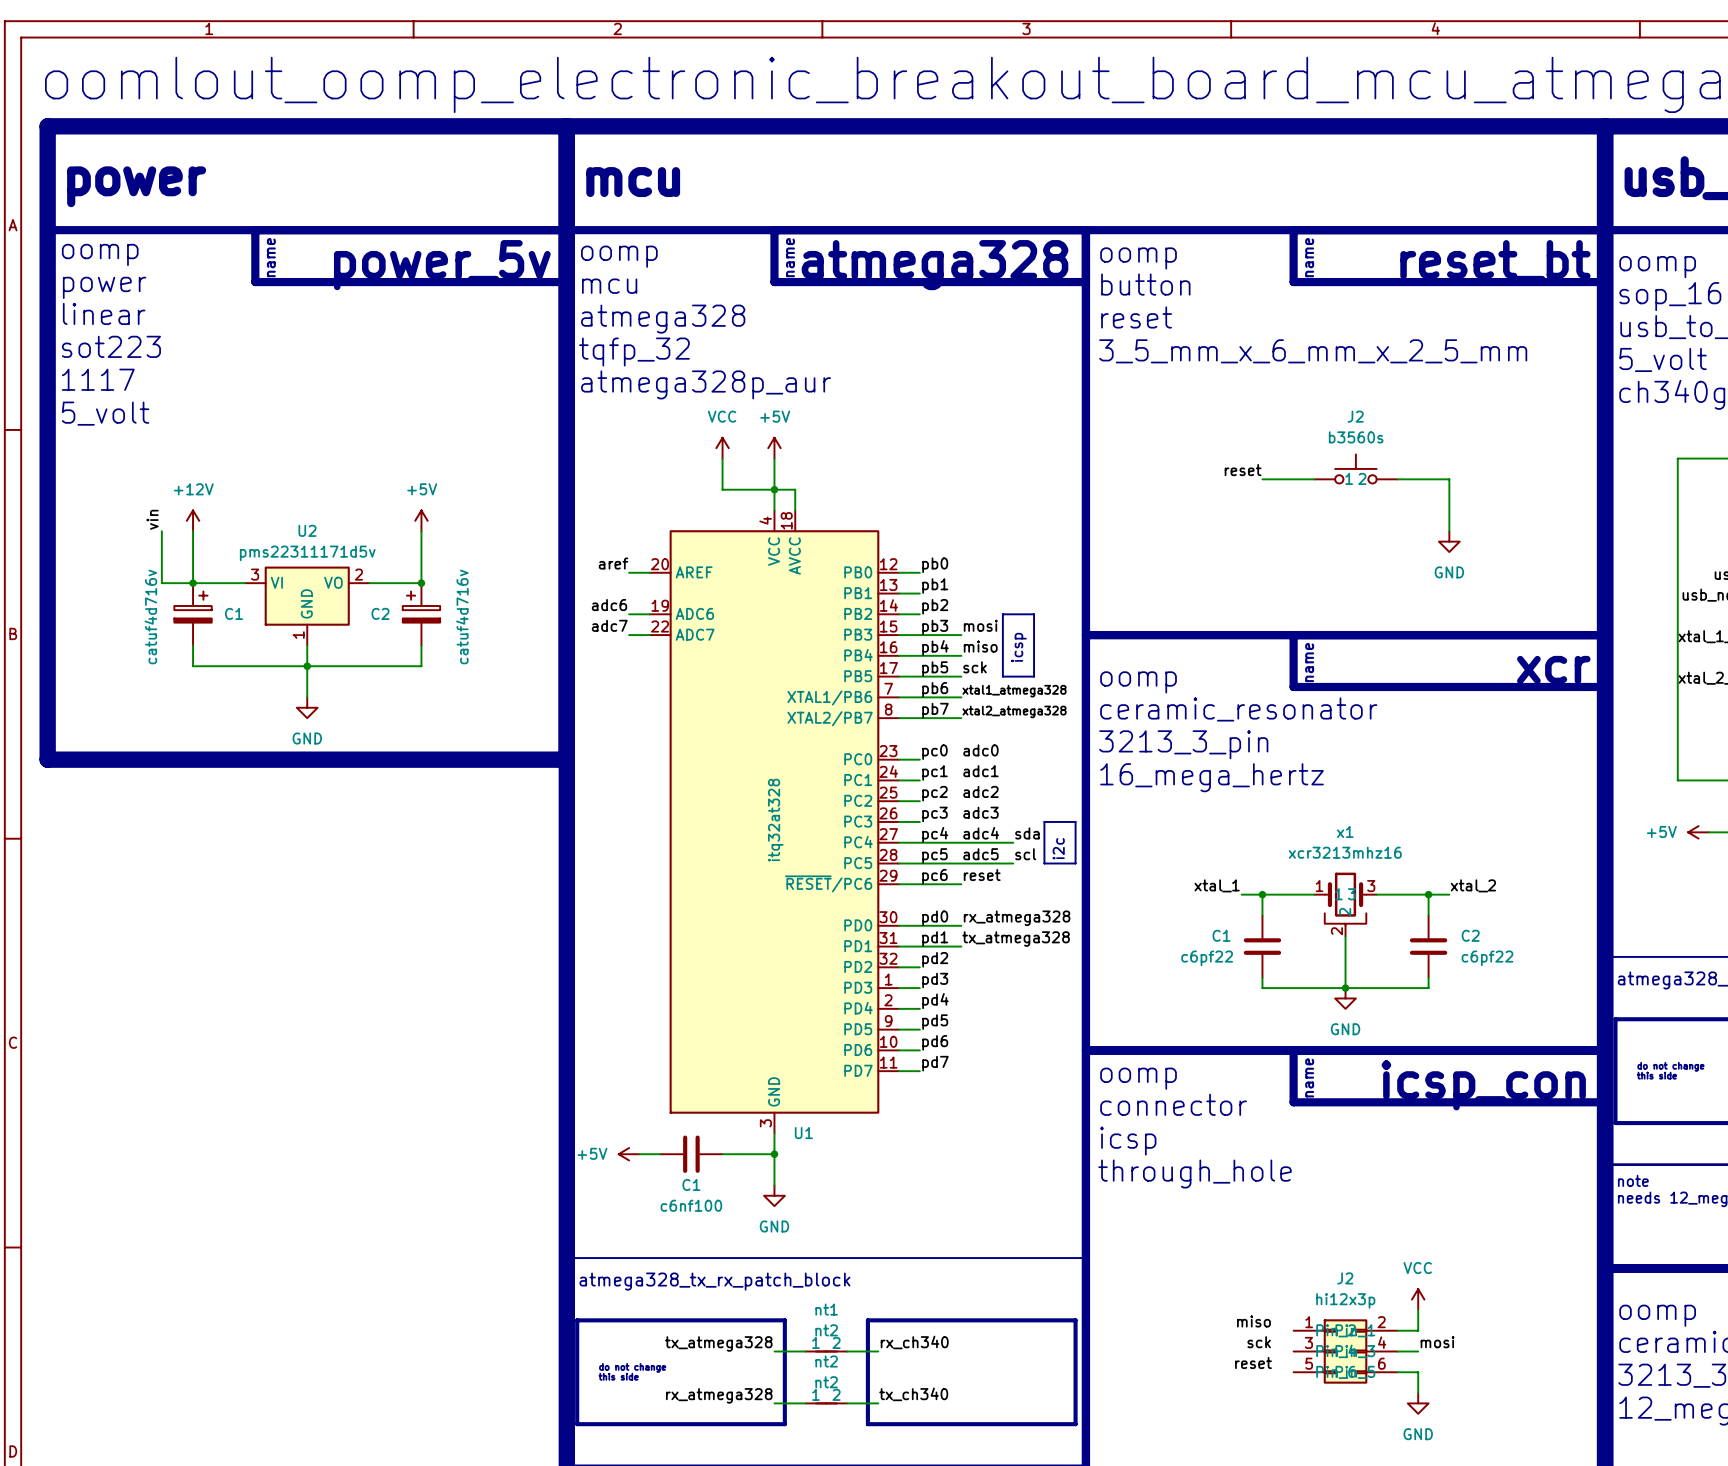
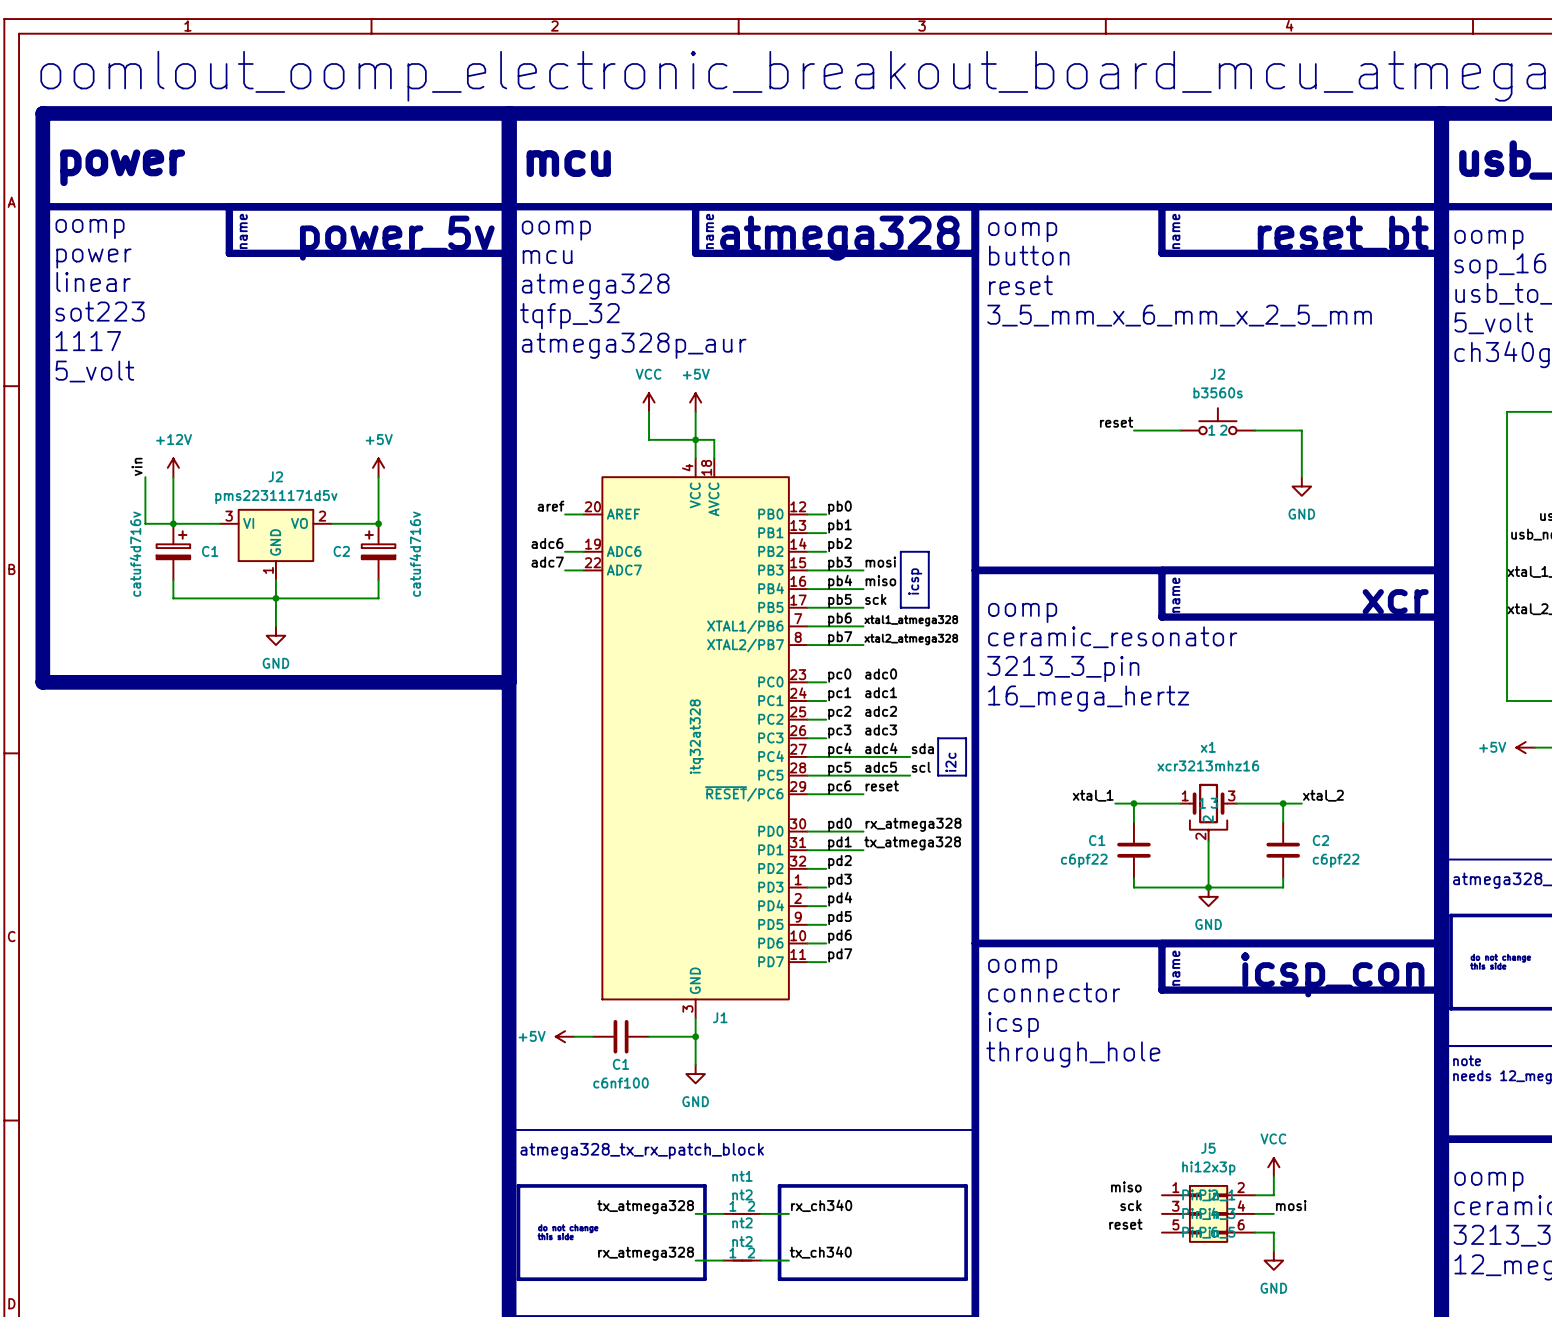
U2 name: U2 (307, 530) -> J2 (275, 476)
U1 name: U1 (803, 1133) -> J1 (720, 1017)
J2 name: J2 (1345, 1278) -> J5 (1208, 1148)

